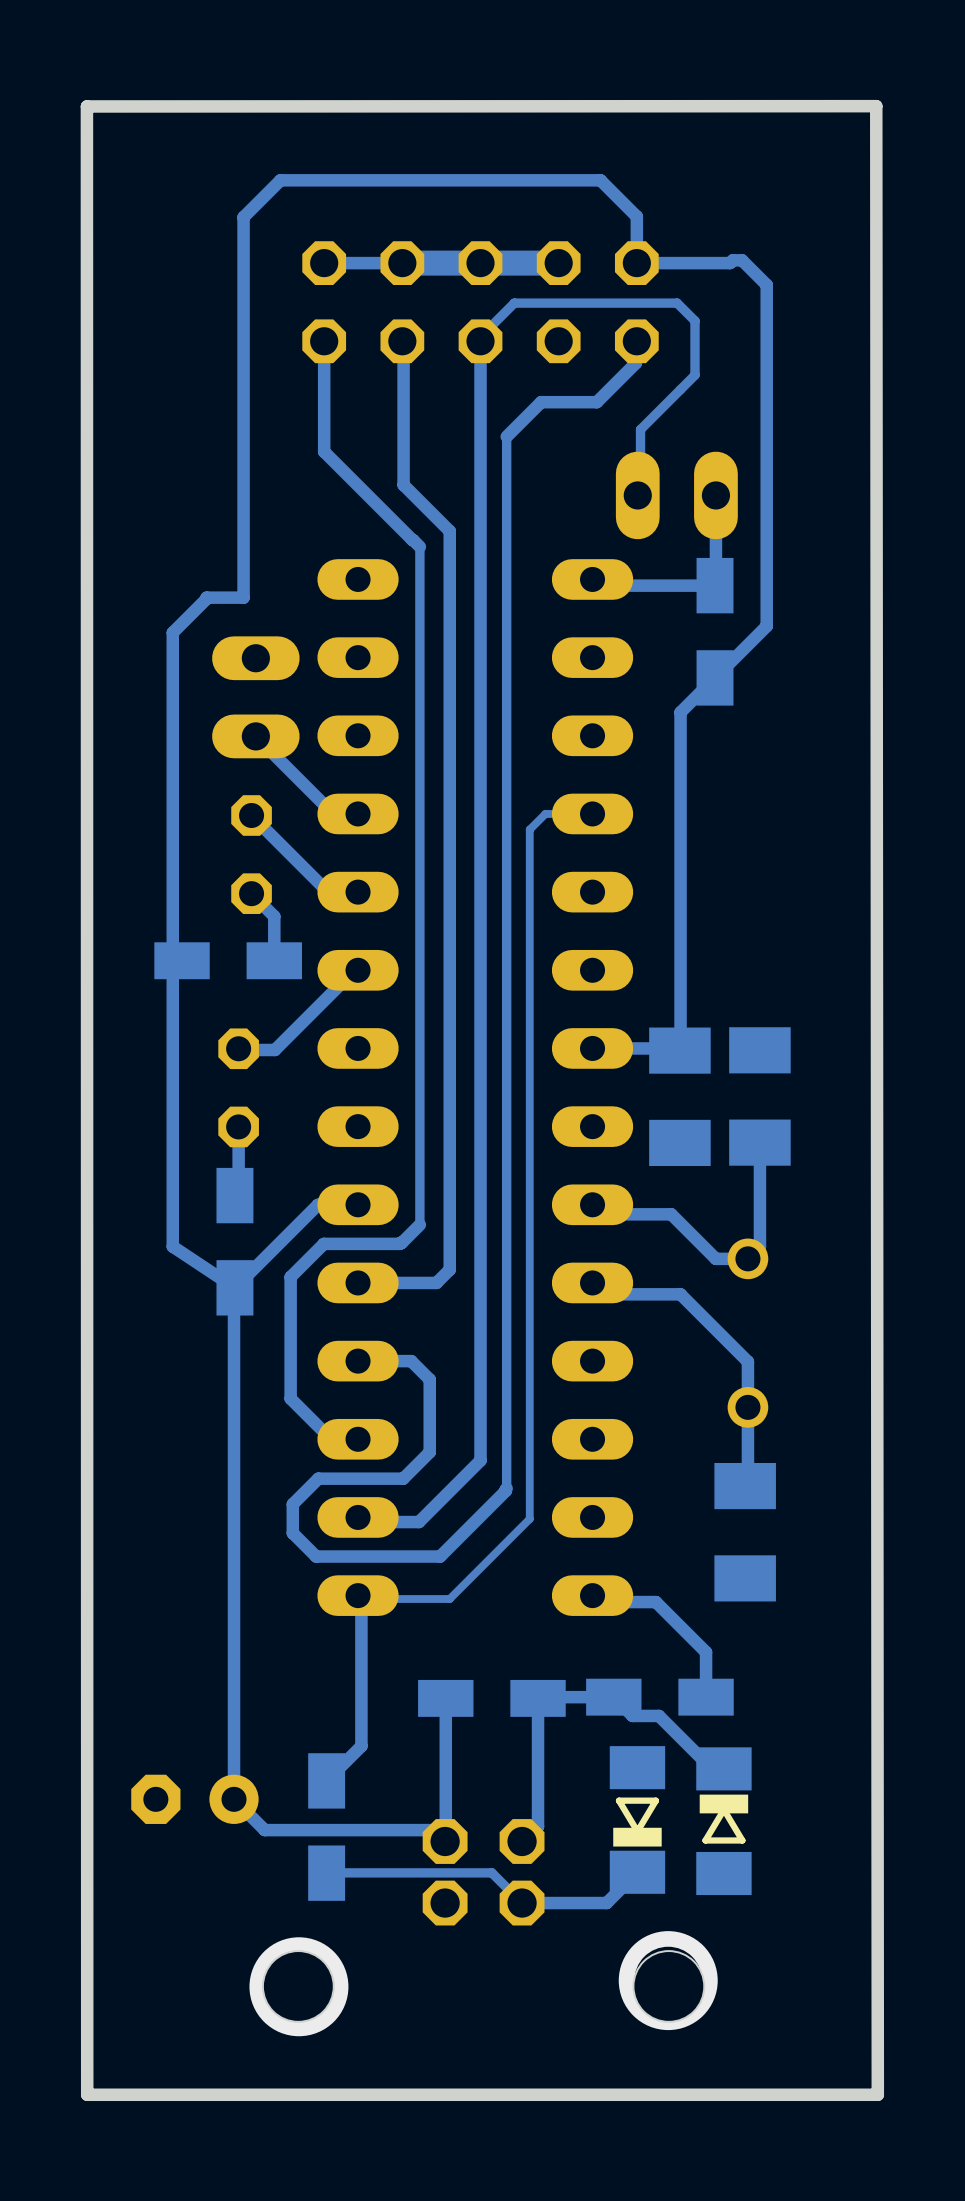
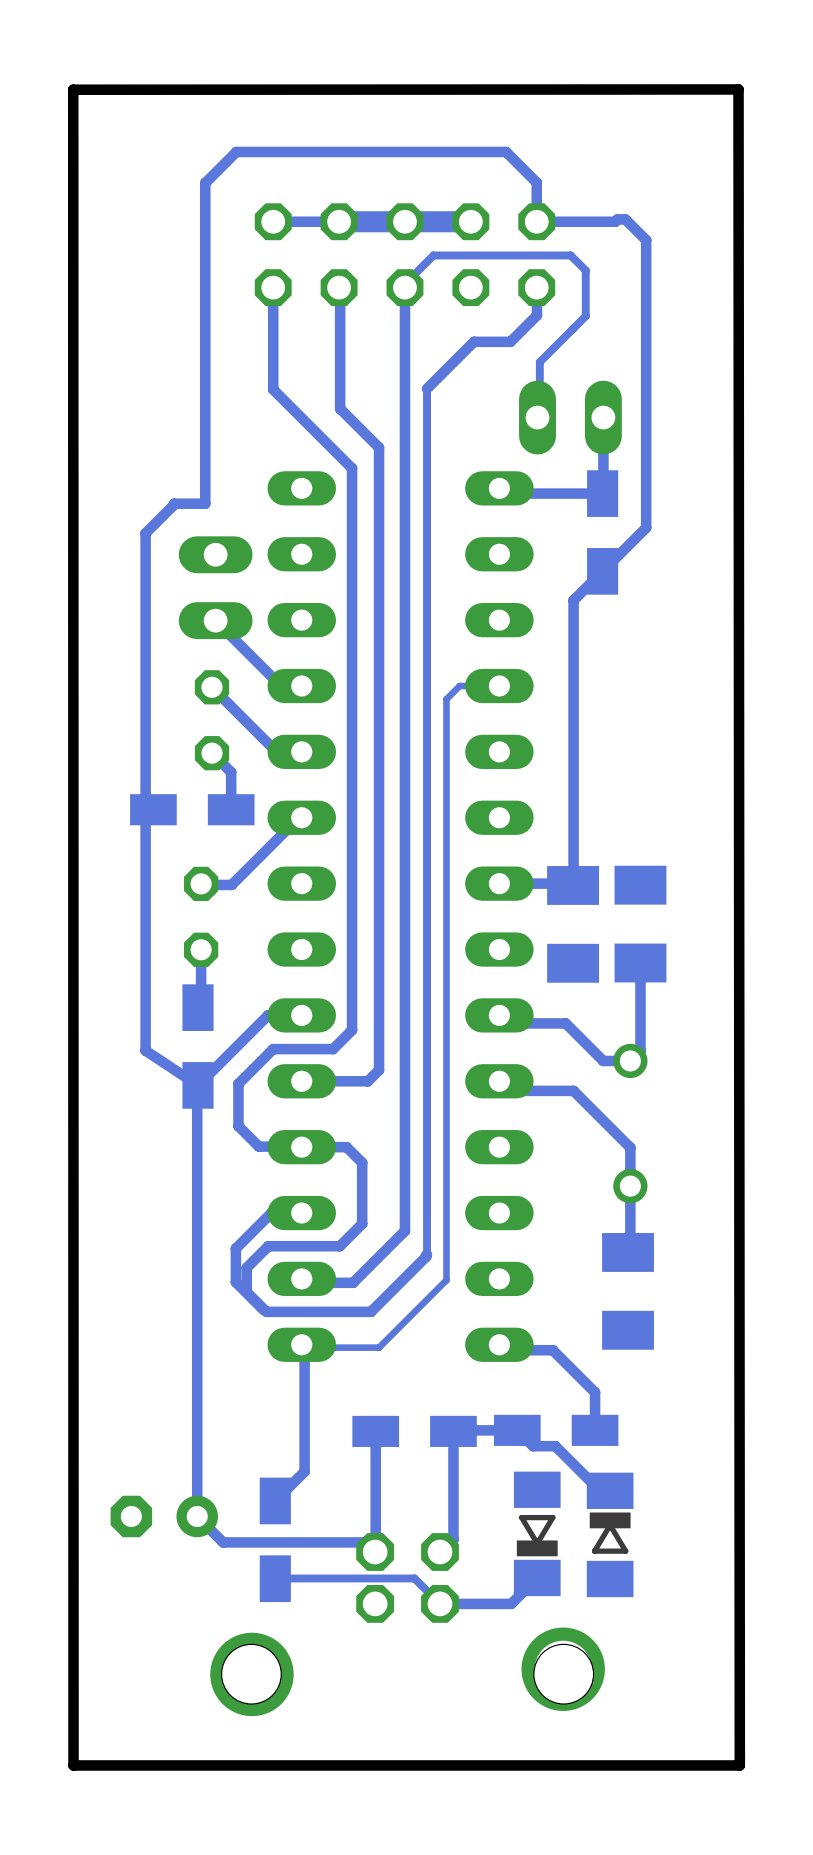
track: (636, 341) (635, 363) (596, 402) (541, 402) (506, 436) (506, 461) -> (536, 287) (536, 315) (510, 341) (473, 341) (427, 388)
track: (324, 451) (412, 540) -> (273, 380) (273, 389) (352, 468) (352, 1030) (333, 1049) (273, 1049) (238, 1083) (238, 1126) (258, 1146) (301, 1147)
track: (413, 540) (419, 546) (419, 1224) (399, 1243) (323, 1243) (290, 1277) (290, 1398) (330, 1438) (358, 1439) -> (263, 1310) (235, 1282) (235, 1248) (271, 1213) (301, 1213)

